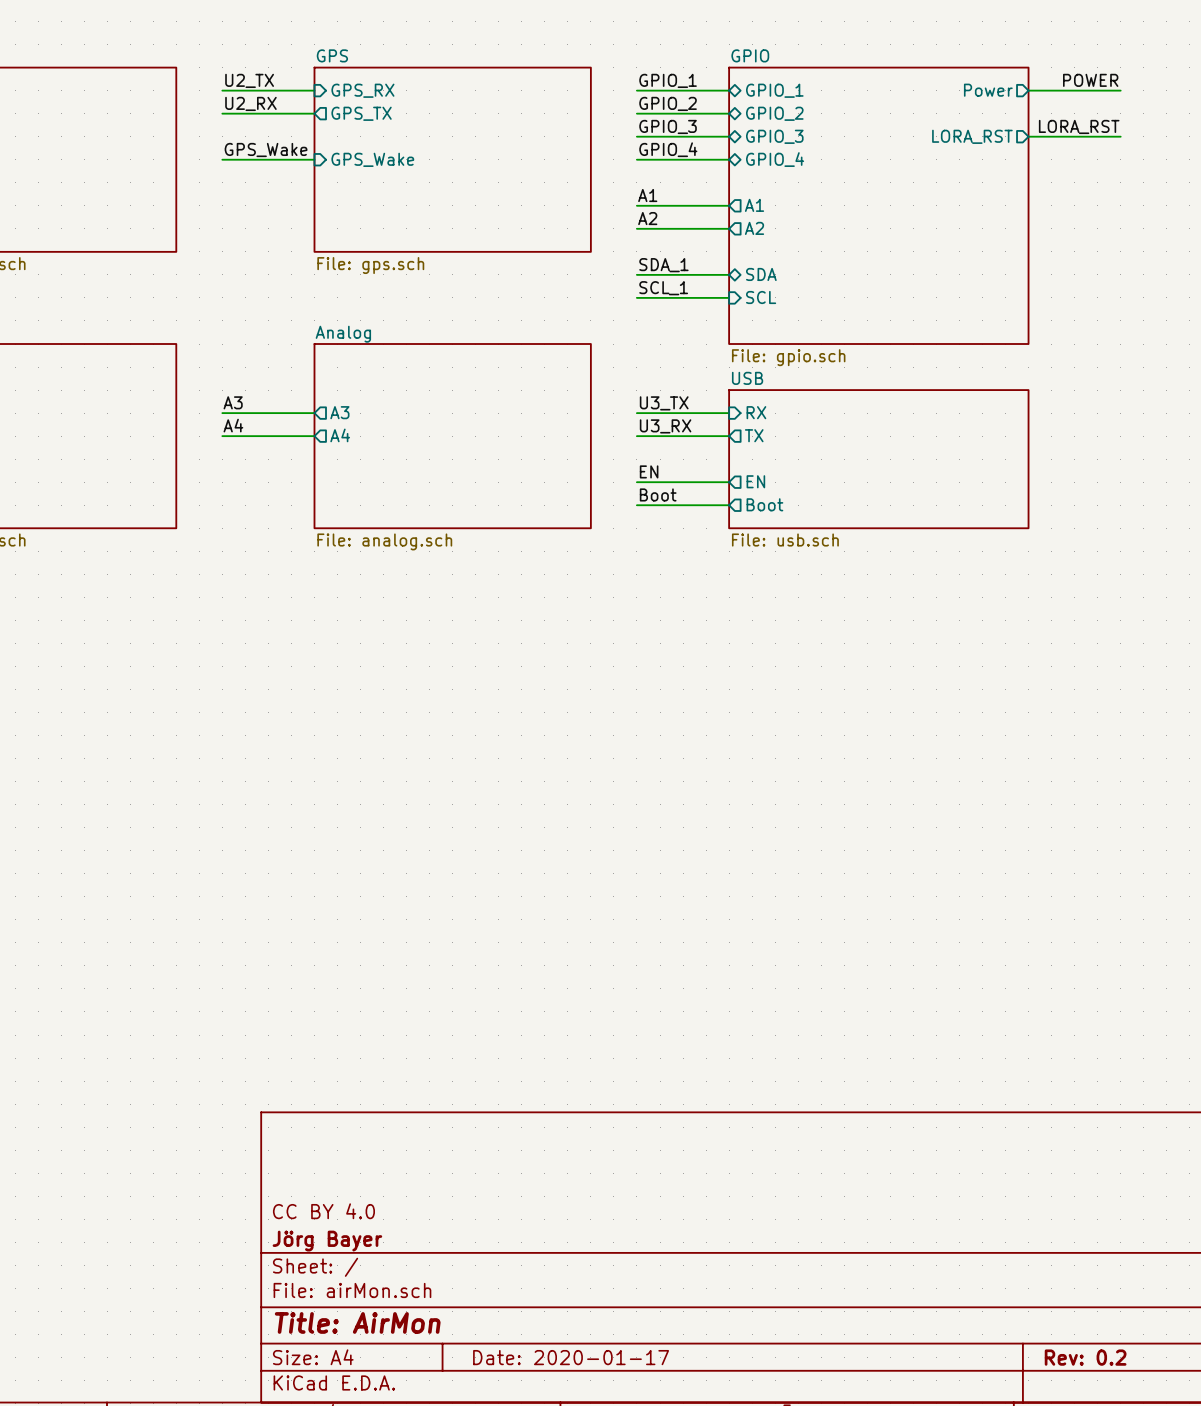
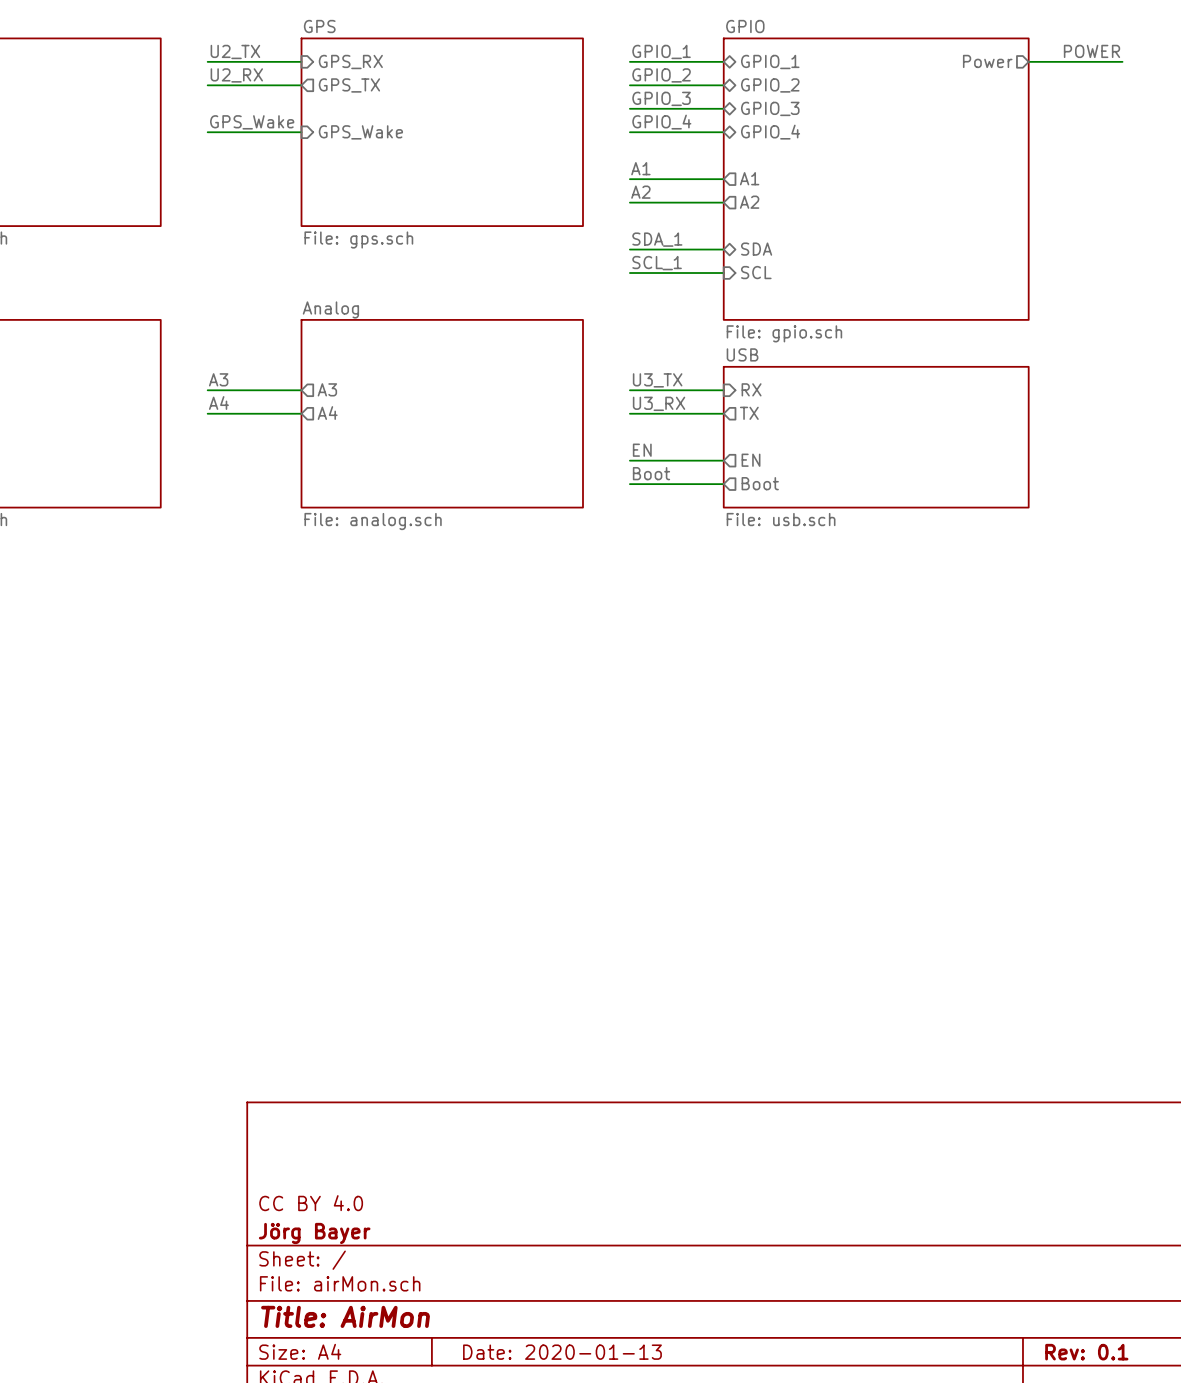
label: LORA_RST (1079, 126) -> none
sheet pin: LORA_RST (972, 136) -> none
wire: (1028, 136) (1120, 136) -> none
title block: Date: 2020-01-17 (571, 1357) -> Date: 2020-01-13 (562, 1352)
title block: Rev: 0.2 (1085, 1357) -> Rev: 0.1 (1086, 1352)

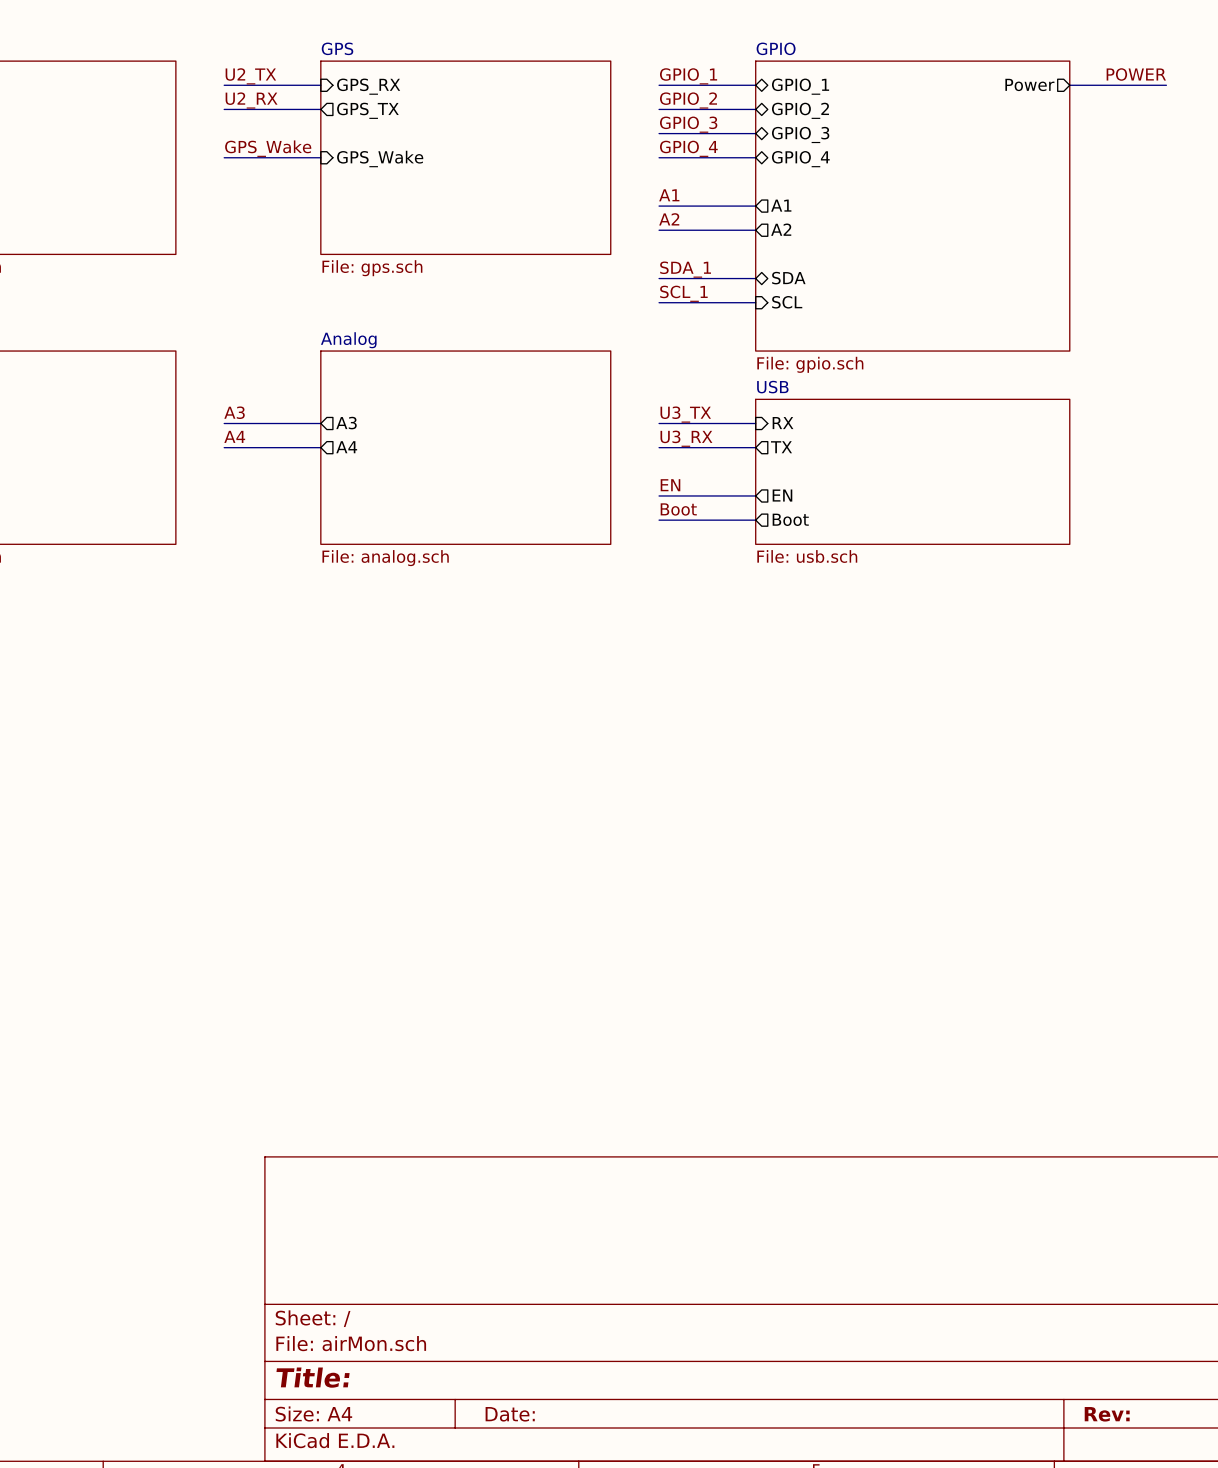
title block: CC BY 4.0 (311, 1203) -> none
title block: Jörg Bayer (314, 1233) -> none
title block: Title: AirMon (345, 1316) -> Title: (313, 1377)
title block: Date: 2020-01-13 (562, 1352) -> Date: (510, 1414)
title block: Rev: 0.1 (1086, 1352) -> Rev: (1107, 1414)

